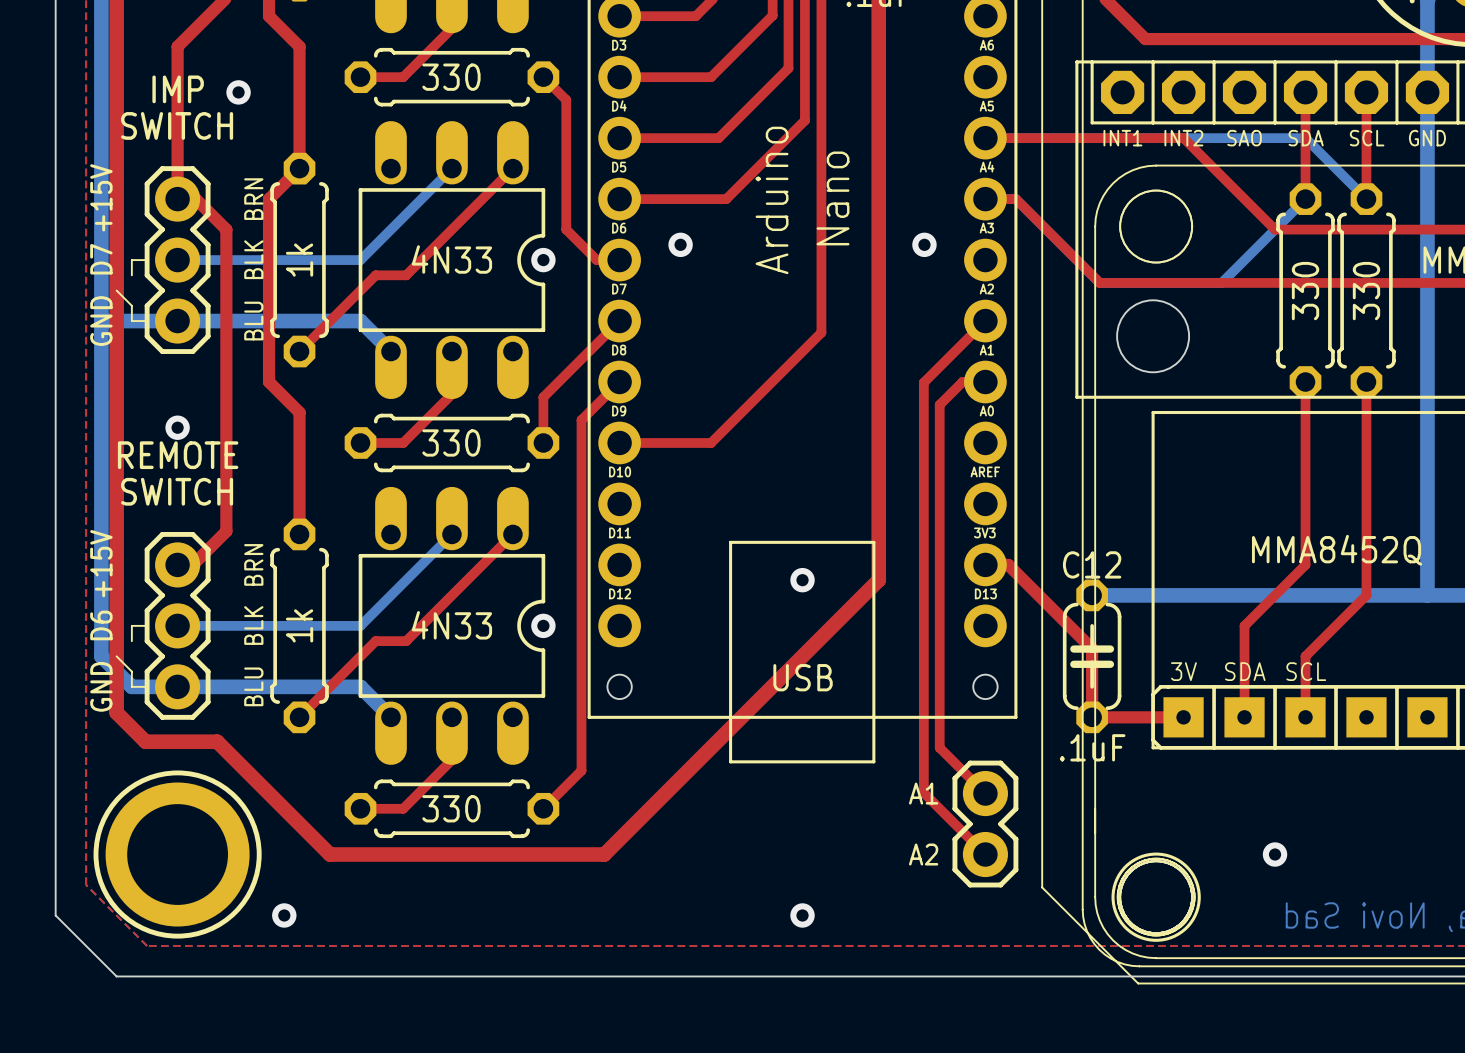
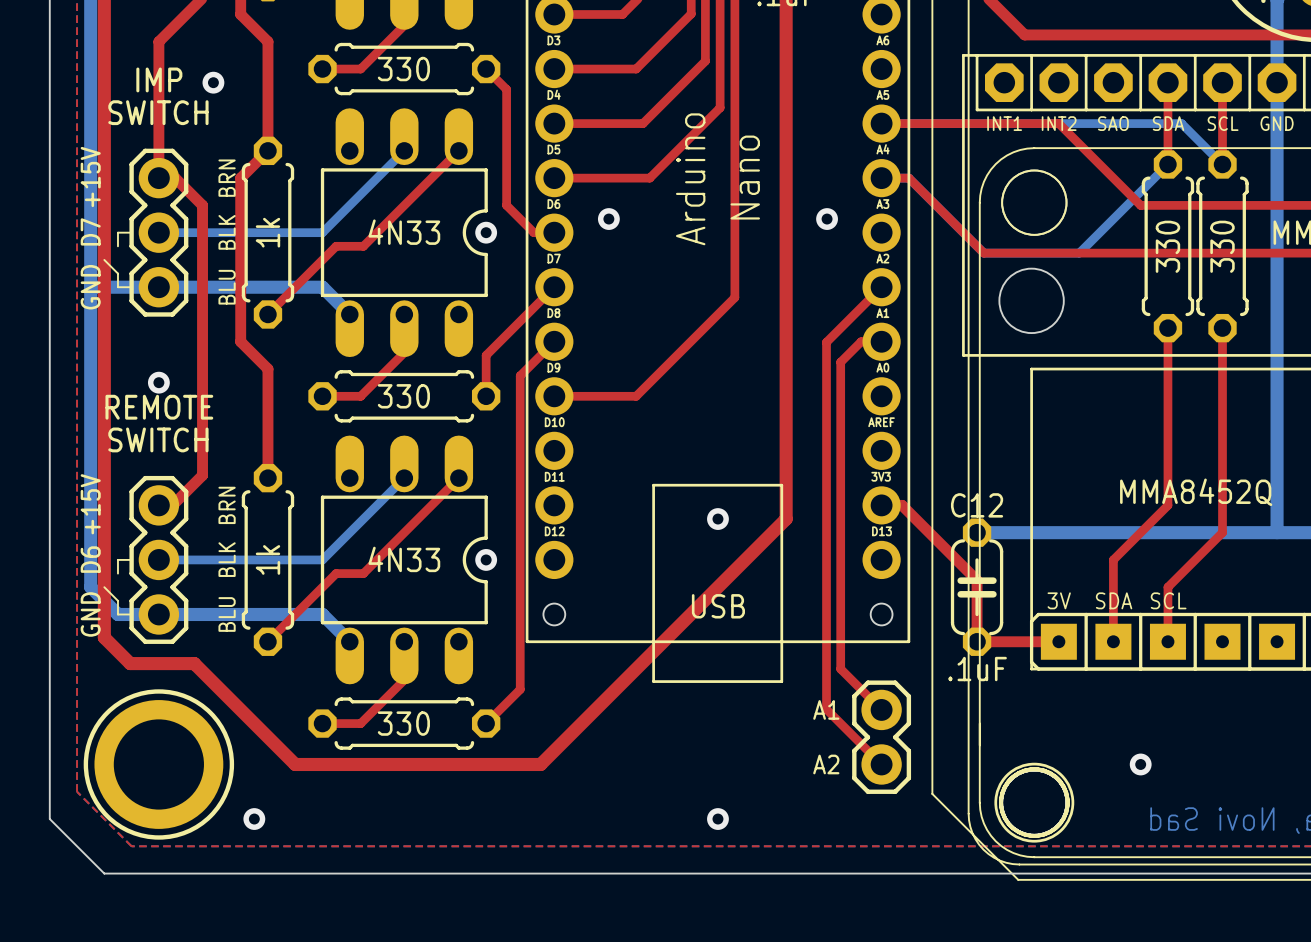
bottom track: (1305, 138) (1366, 199) -> (1167, 123) (1181, 123) (1222, 164)
bottom track: (1305, 199) (1221, 282) (1206, 282) -> (1167, 164) (1079, 253)
part position: (1305, 290) -> (1167, 246)
part position: (1366, 290) -> (1222, 246)
text position: 330 (1305, 291) -> 330 (1167, 246)
text position: 330 (1366, 291) -> 330 (1222, 246)

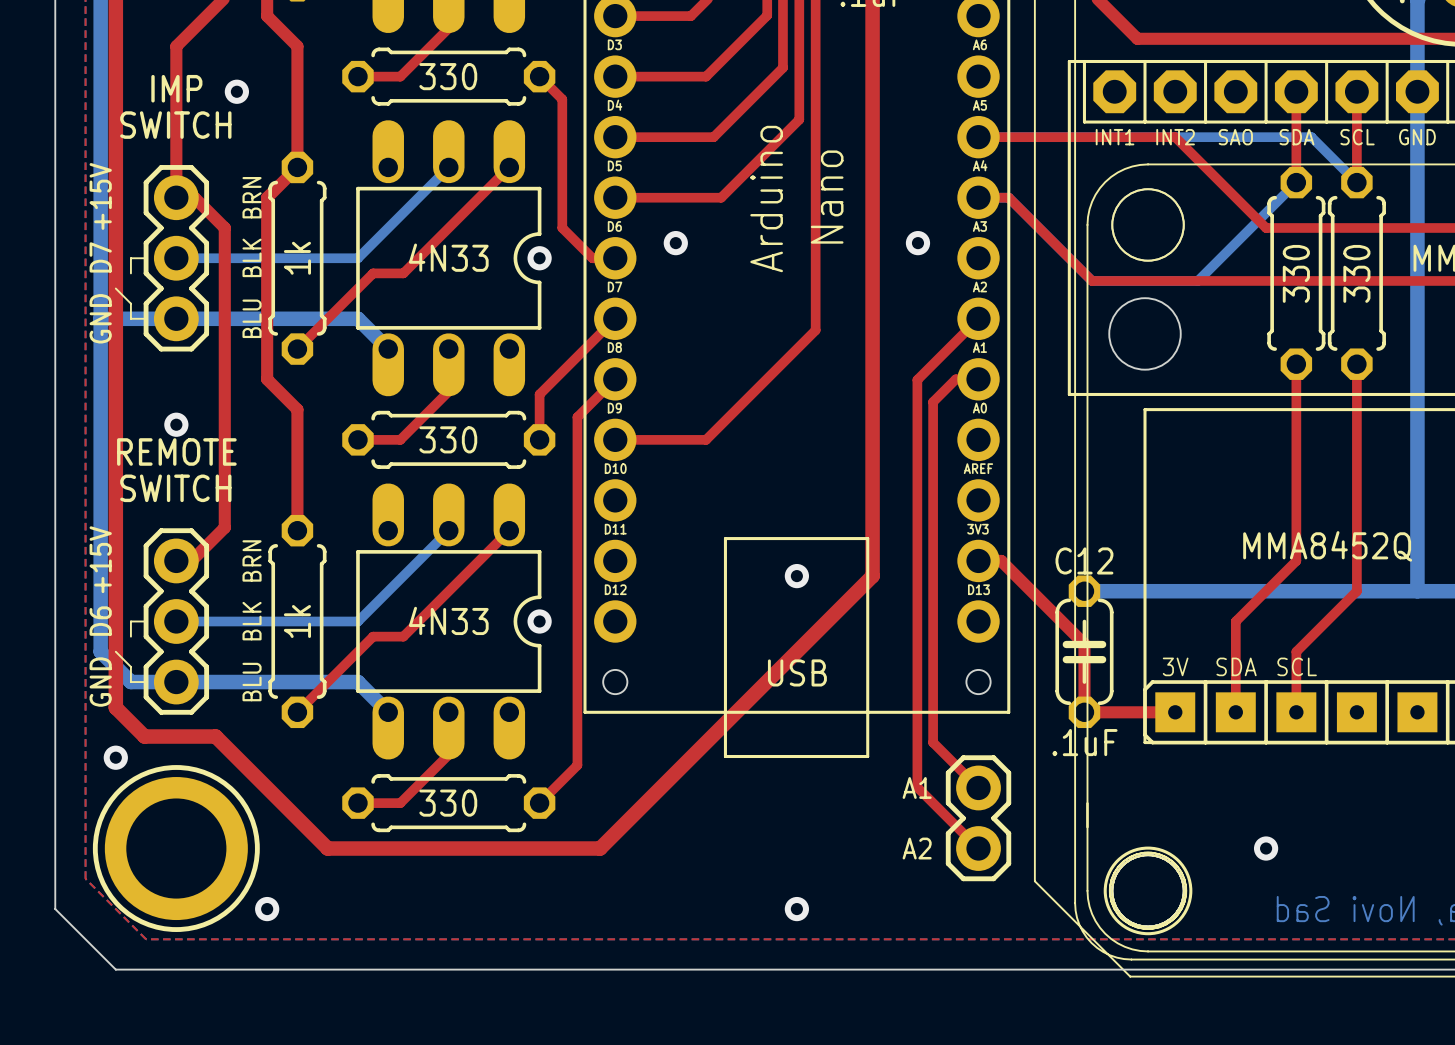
via: none -> (115, 757)
via position: (254, 819) -> (267, 909)

